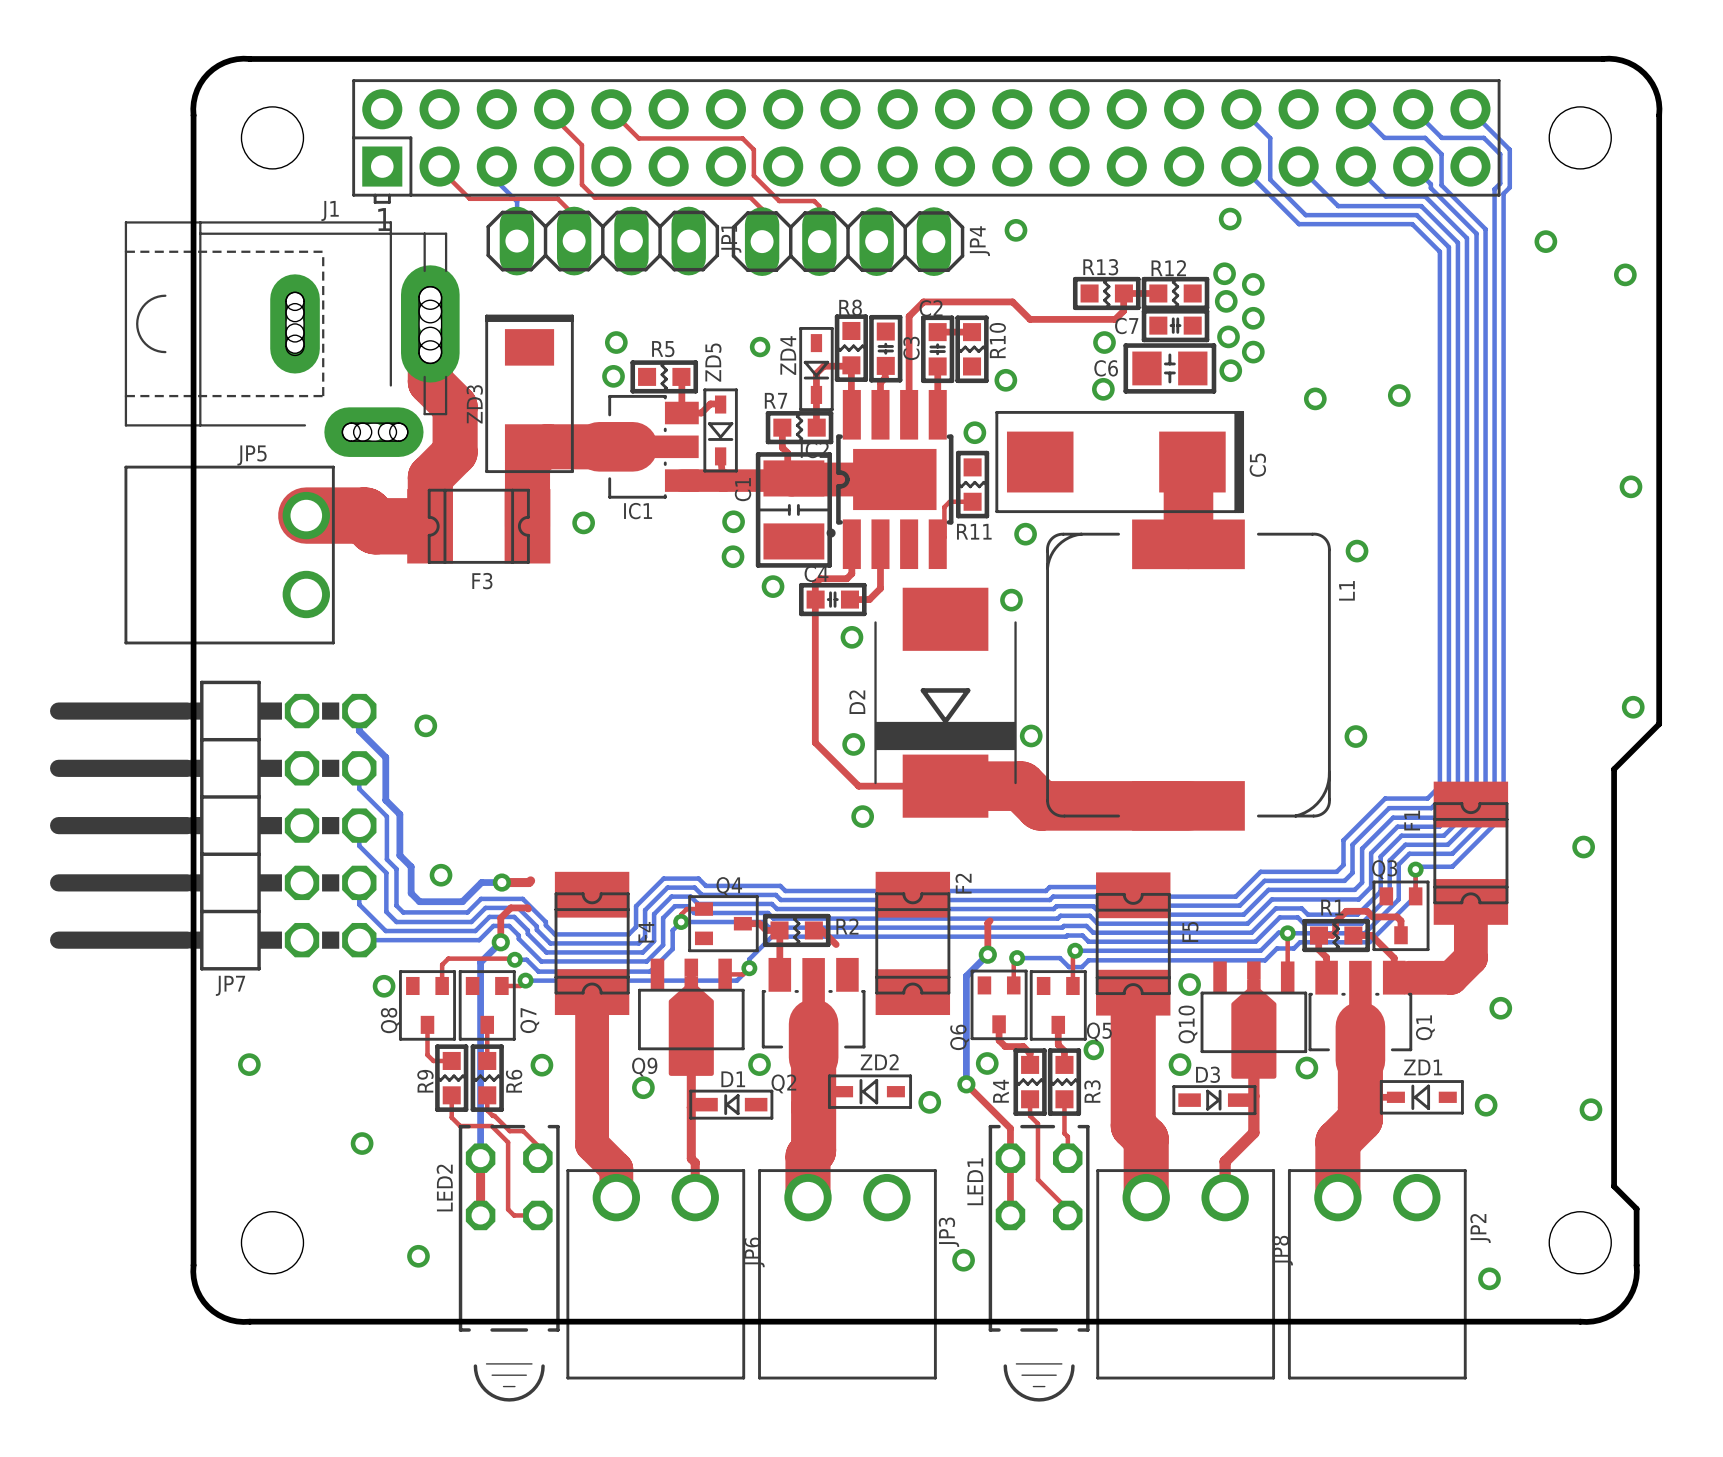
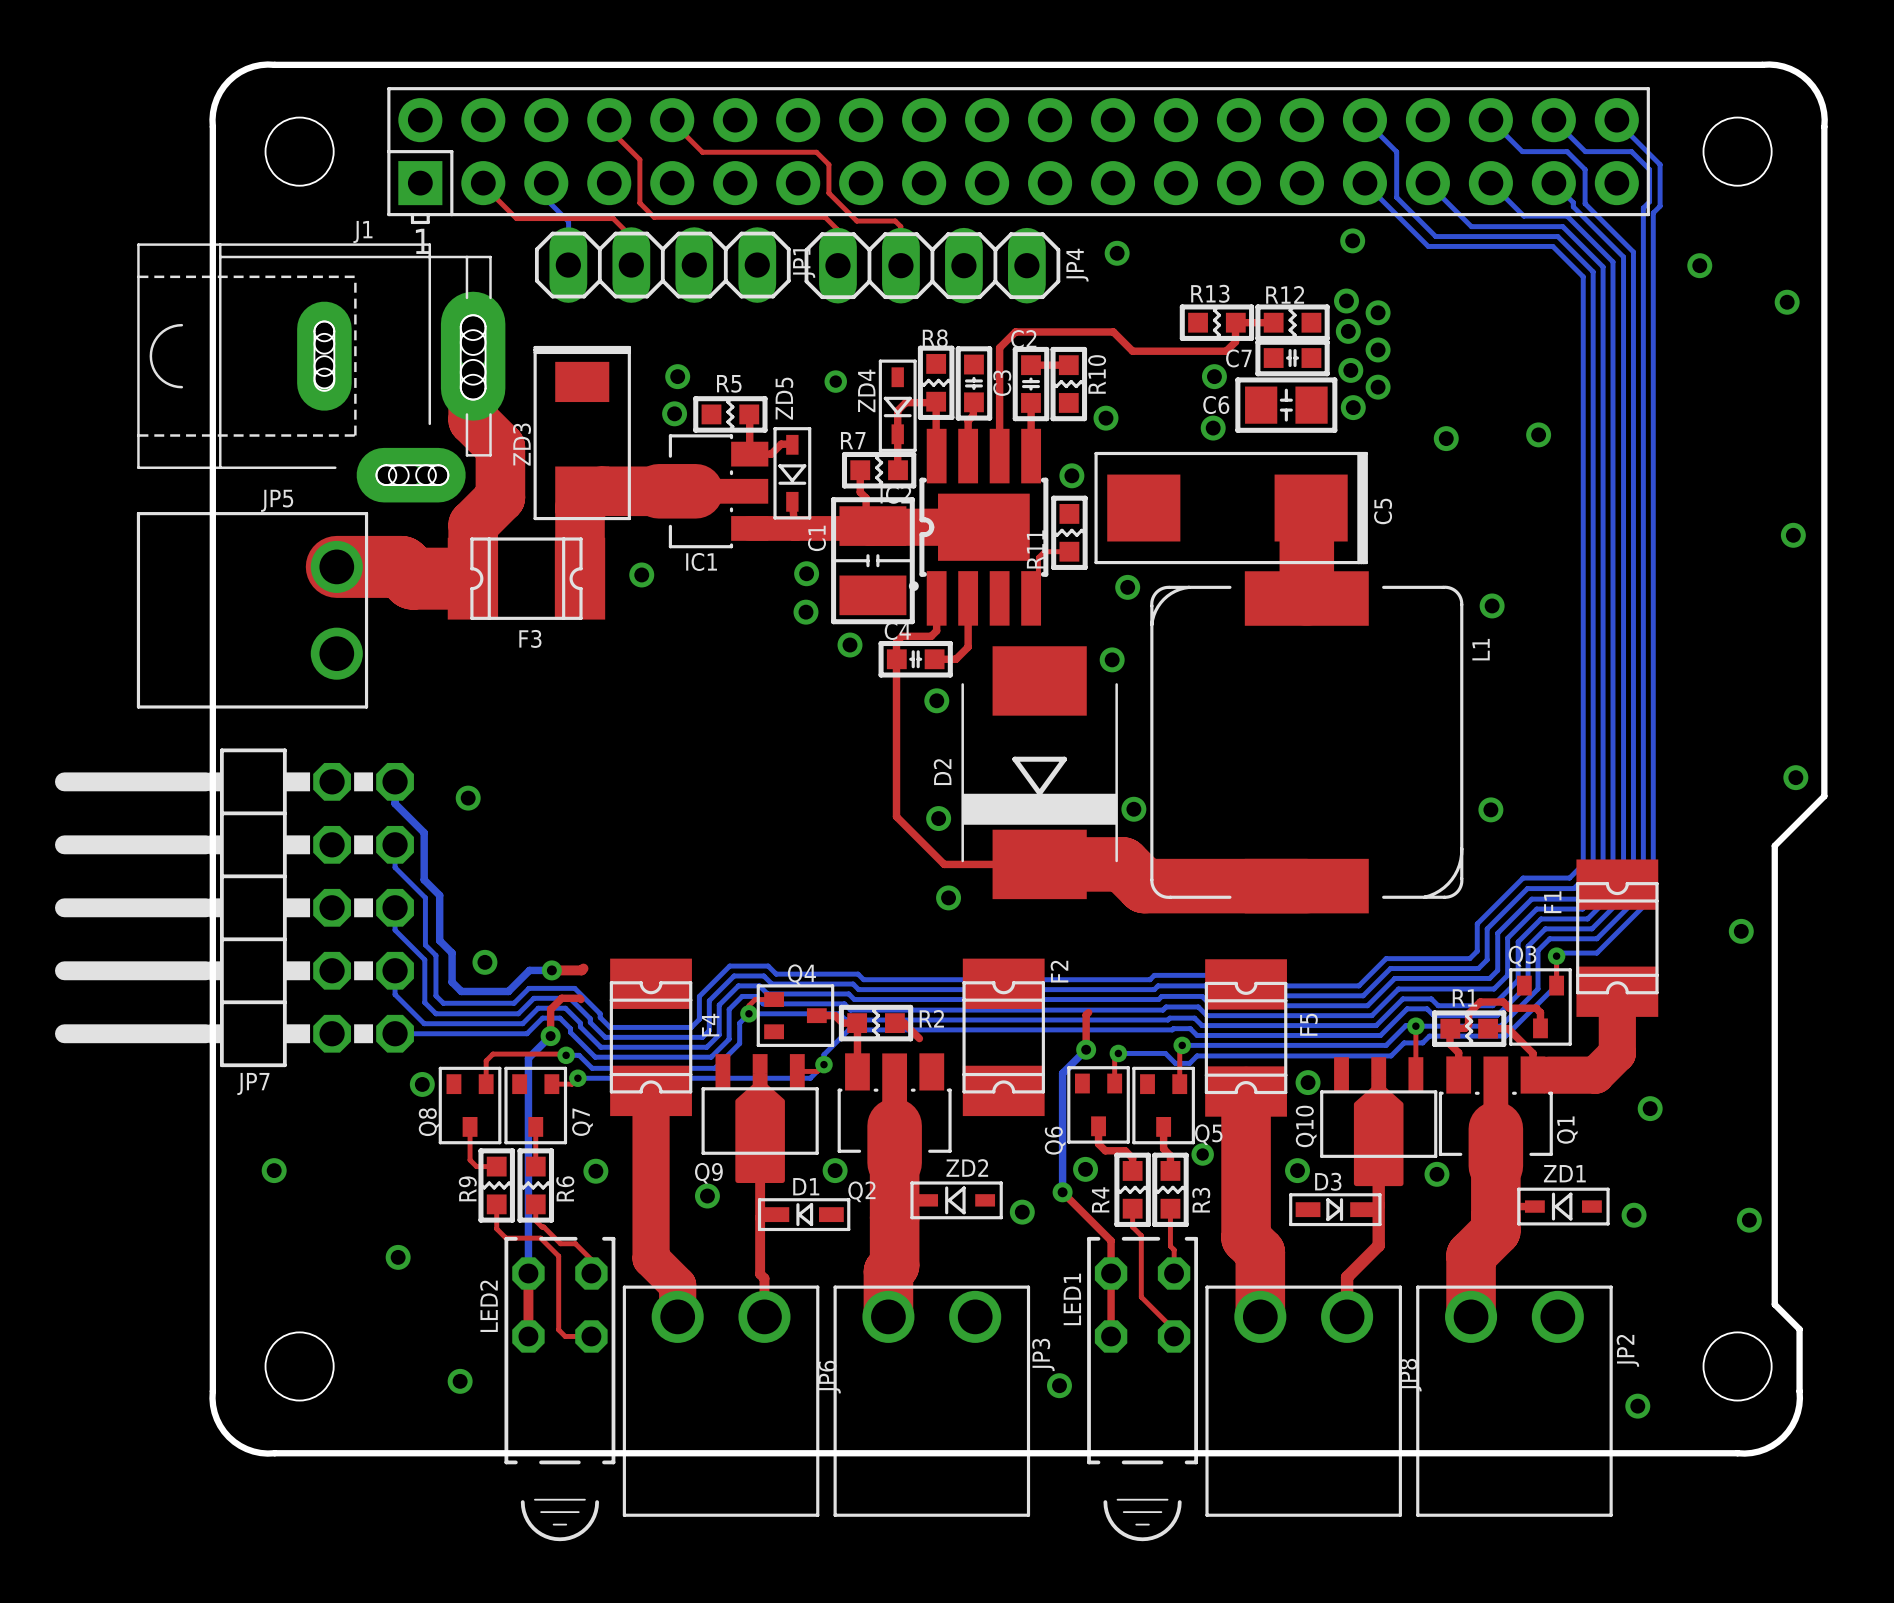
R11 name rotation: 0° (974, 531) -> 90° counterclockwise (1035, 549)

